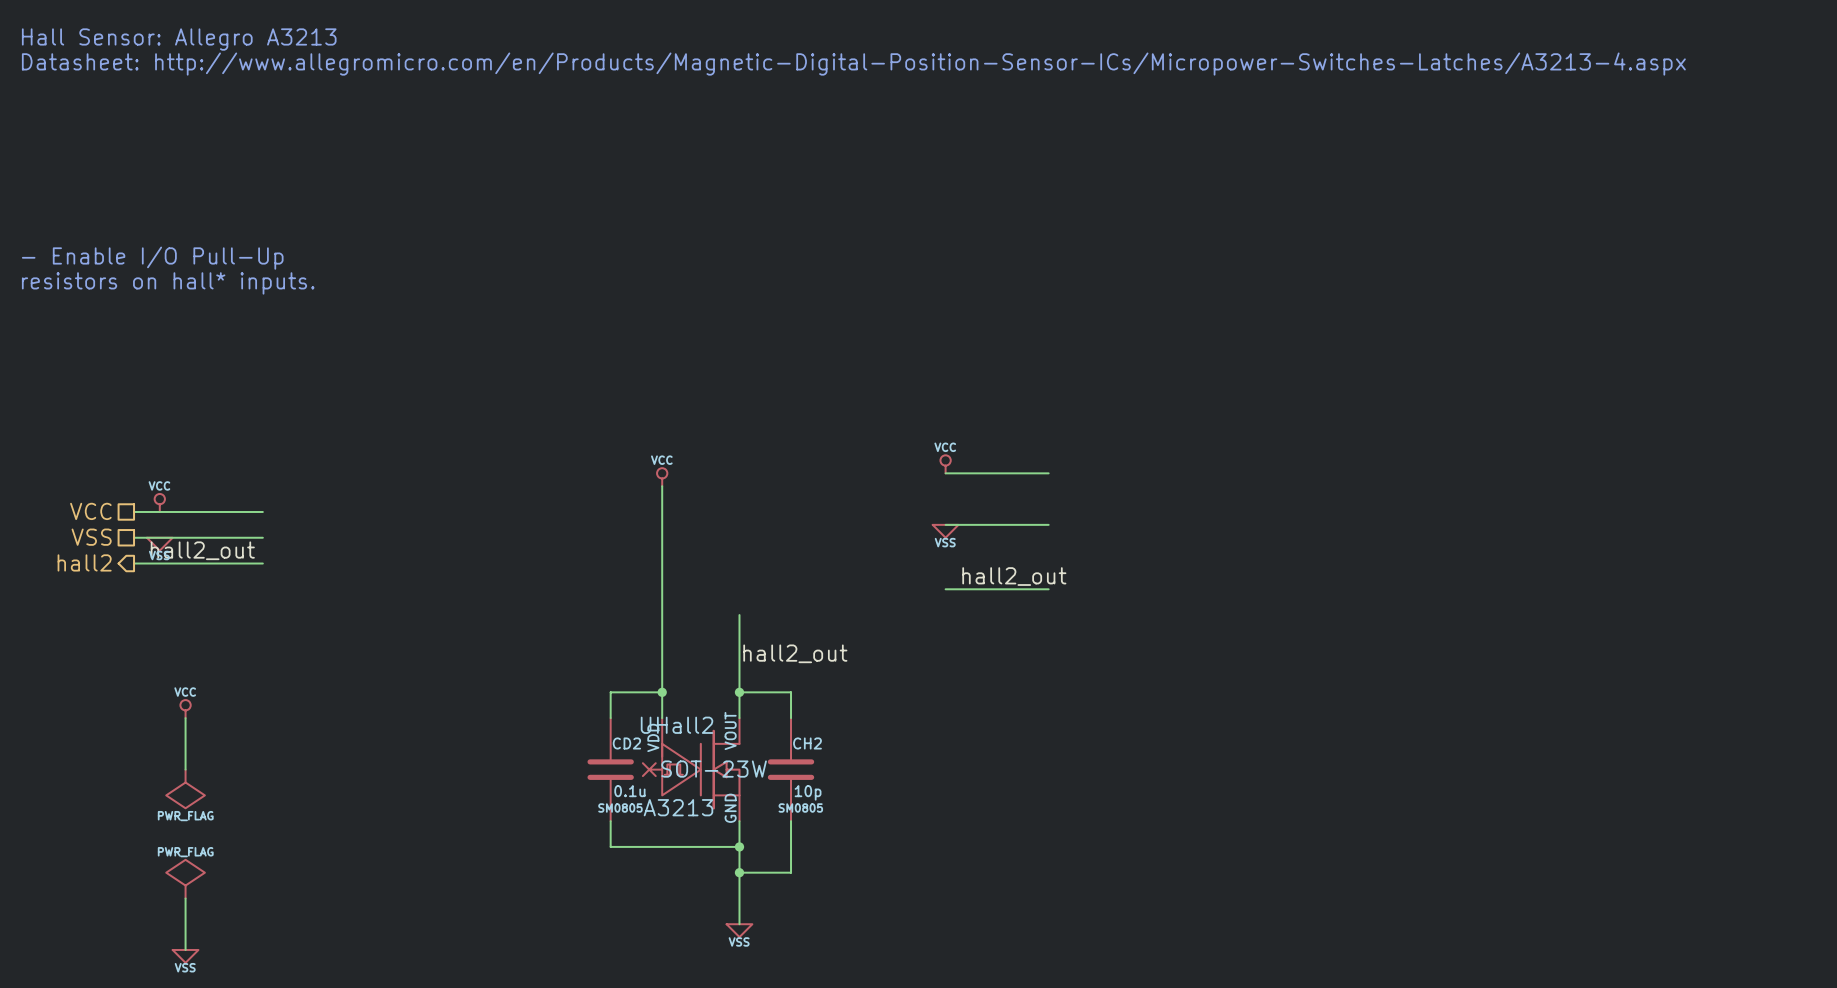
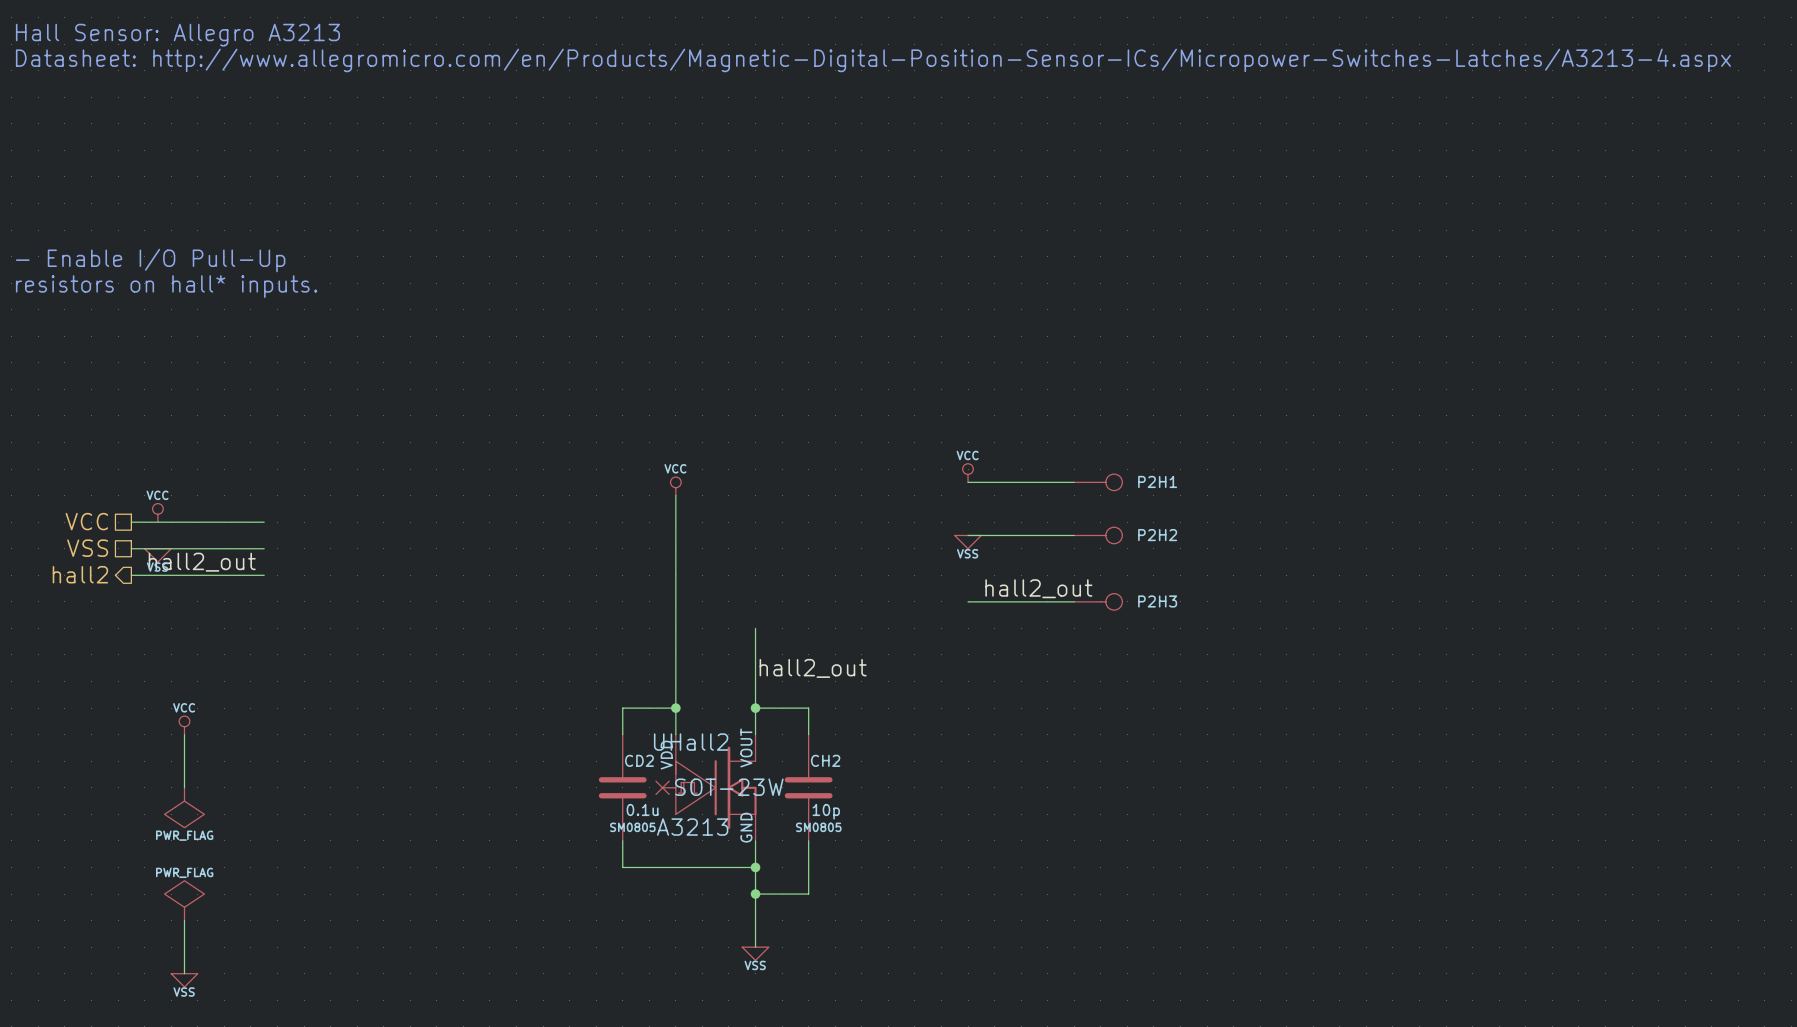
P2H1: none -> (1098, 482)
P2H2: none -> (1098, 535)
P2H3: none -> (1098, 601)

